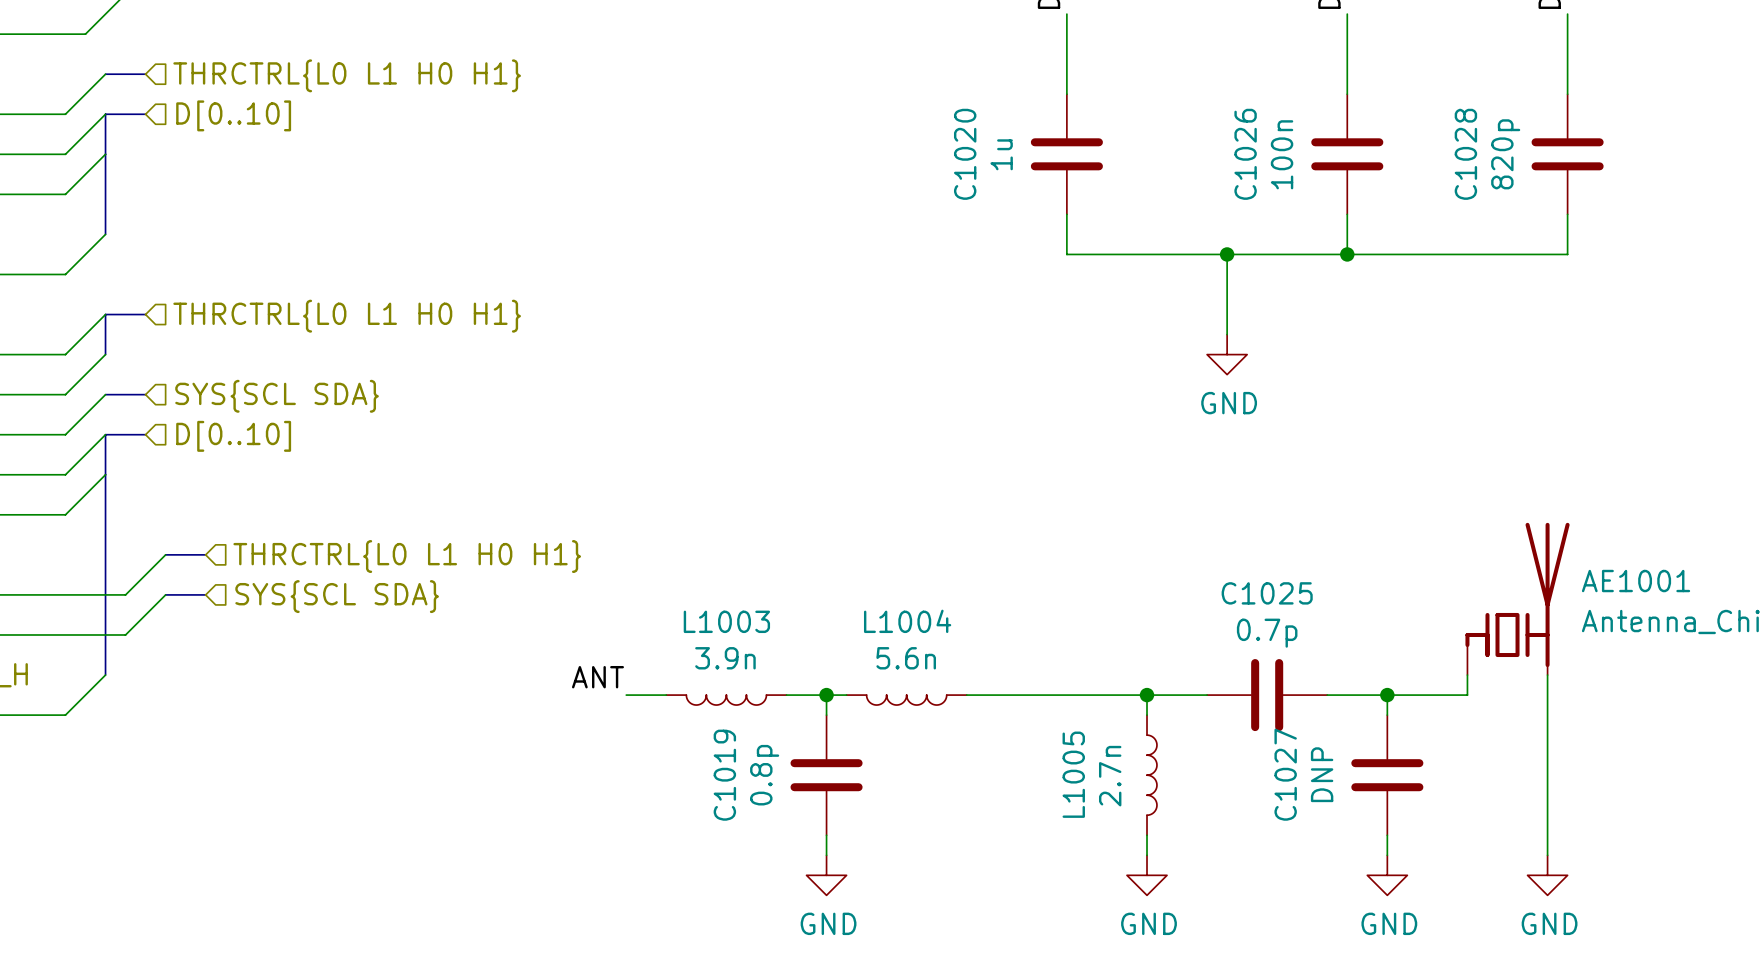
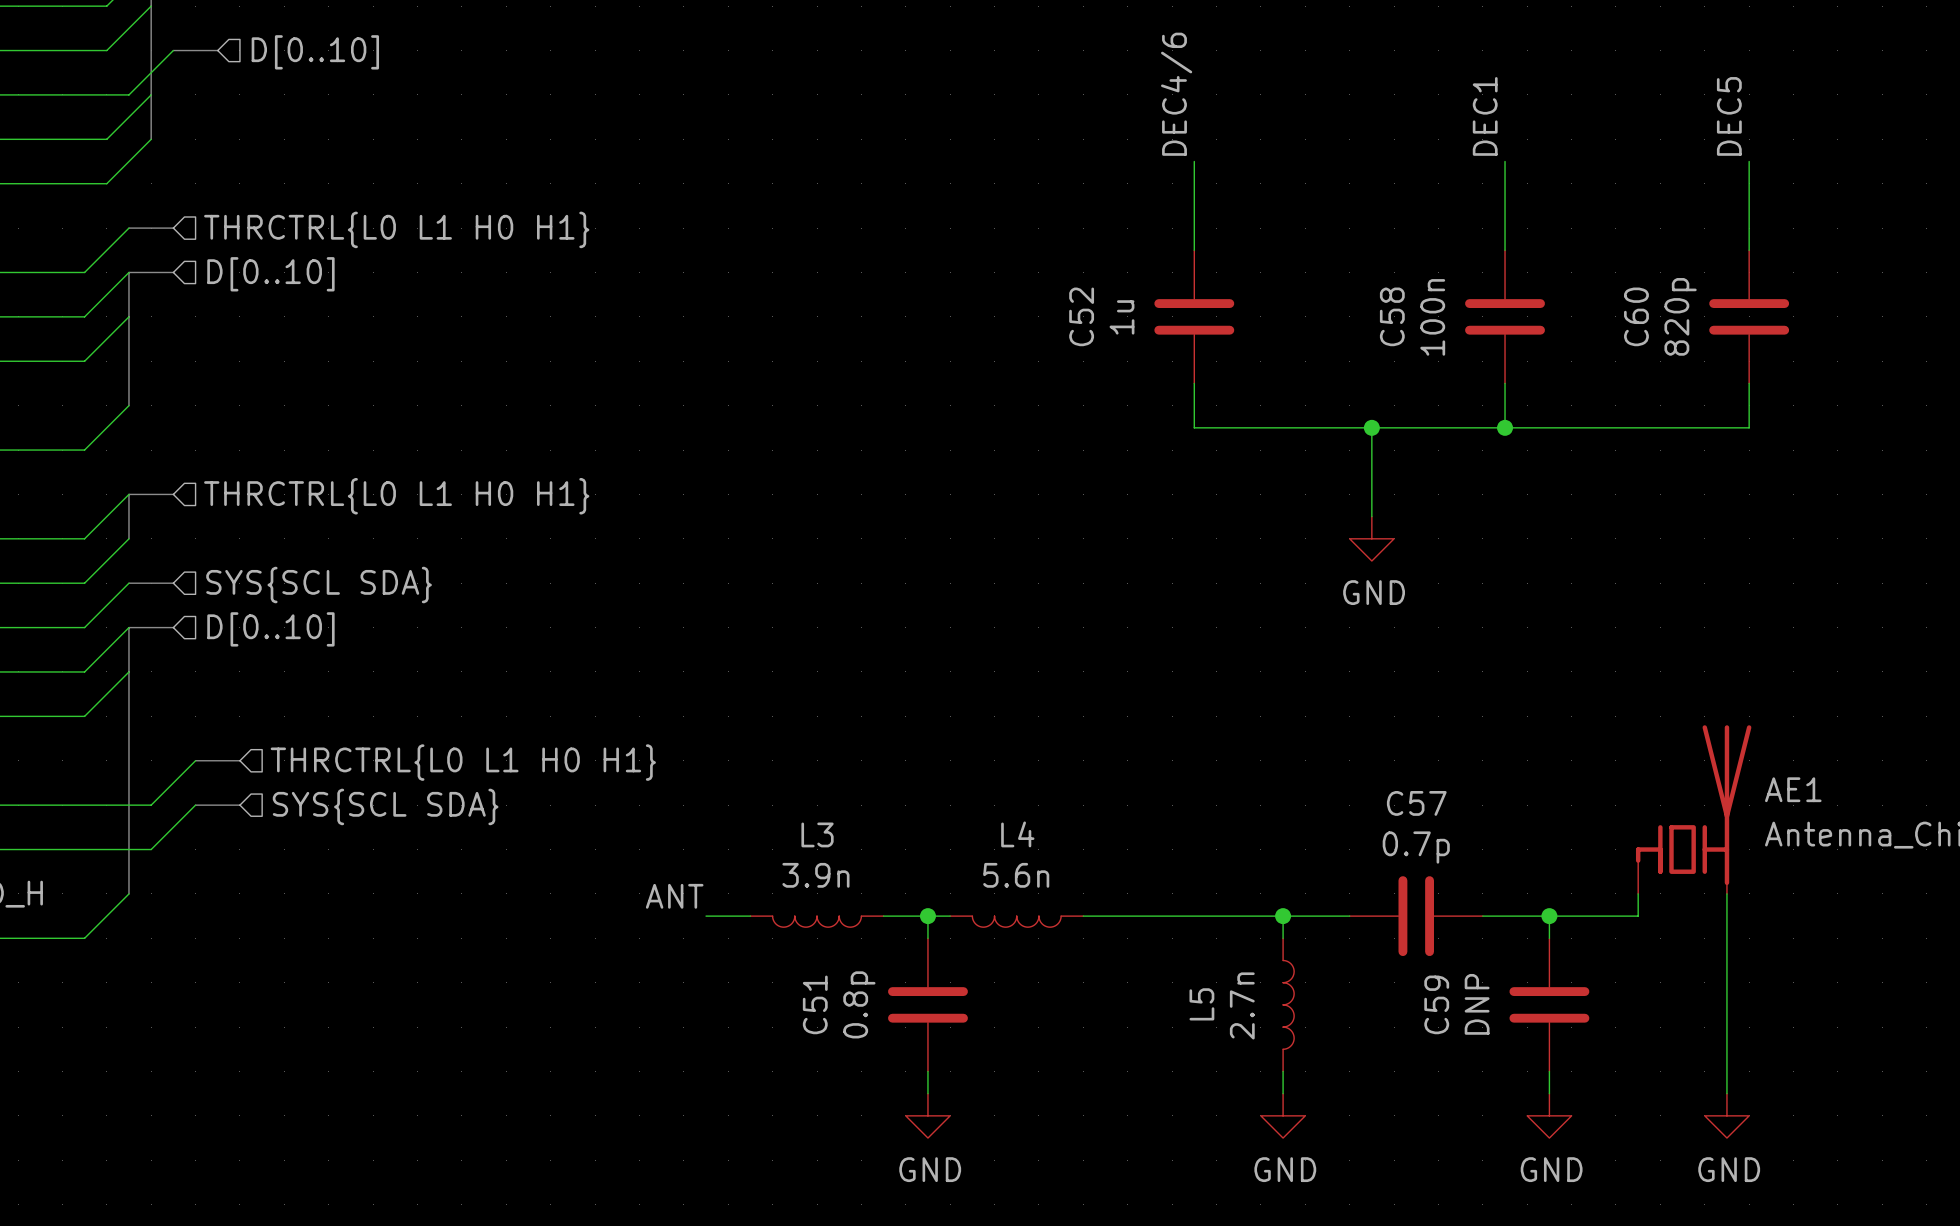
C1020 name: C1020 (965, 154) -> C52 (1081, 316)
C1026 name: C1026 (1245, 154) -> C58 (1392, 316)
C1028 name: C1028 (1465, 154) -> C60 (1636, 316)
AE1001 name: AE1001 (1636, 581) -> AE1 (1793, 789)
C1025 name: C1025 (1267, 593) -> C57 (1416, 803)
L1003 name: L1003 (726, 621) -> L3 (817, 834)
L1004 name: L1004 (907, 621) -> L4 (1017, 834)
L1005 name: L1005 (1073, 774) -> L5 (1201, 1004)
C1027 name: C1027 (1285, 774) -> C59 (1436, 1004)
C1019 name: C1019 (724, 775) -> C51 (815, 1004)

